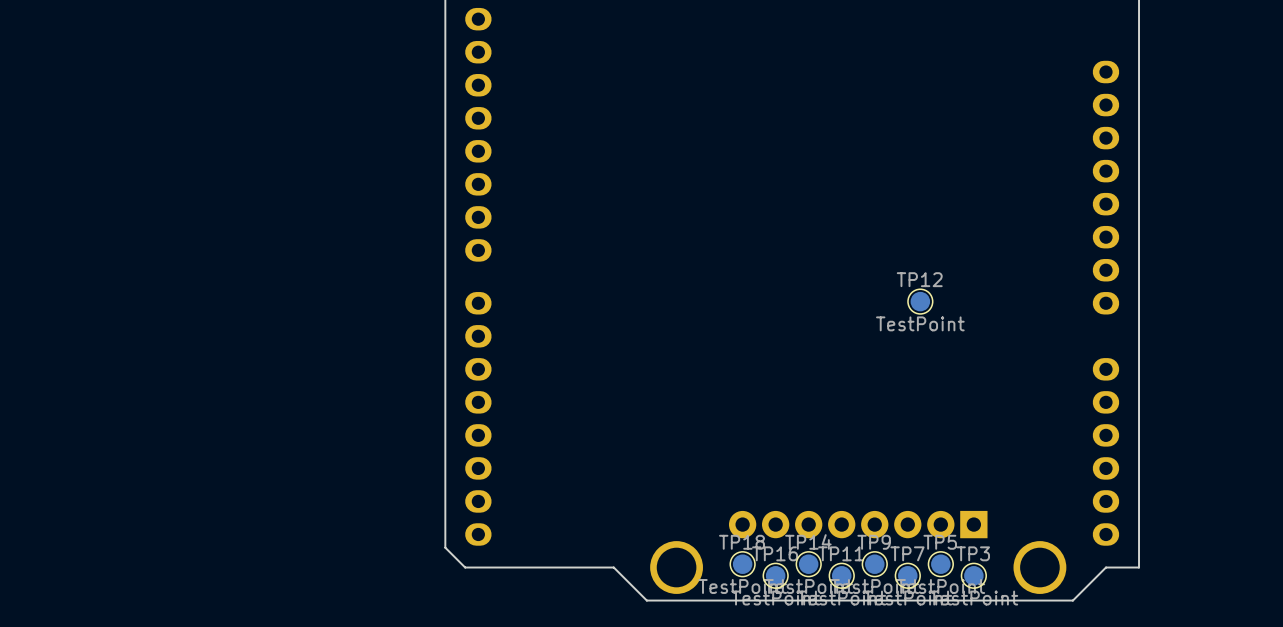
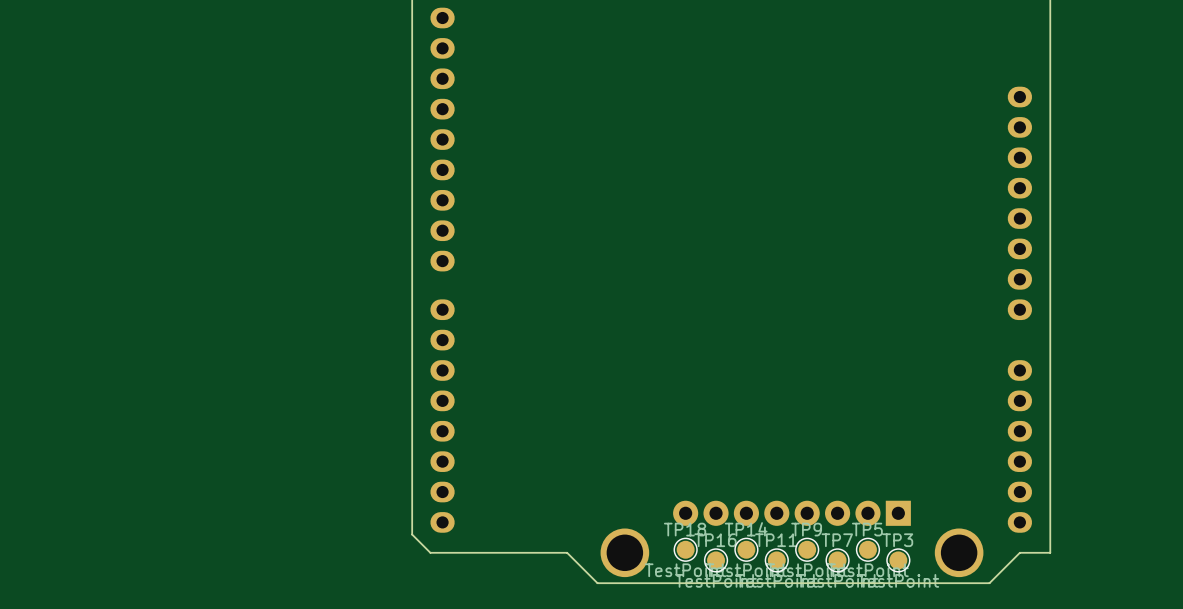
TP12: TestPoint (920, 301) -> none

